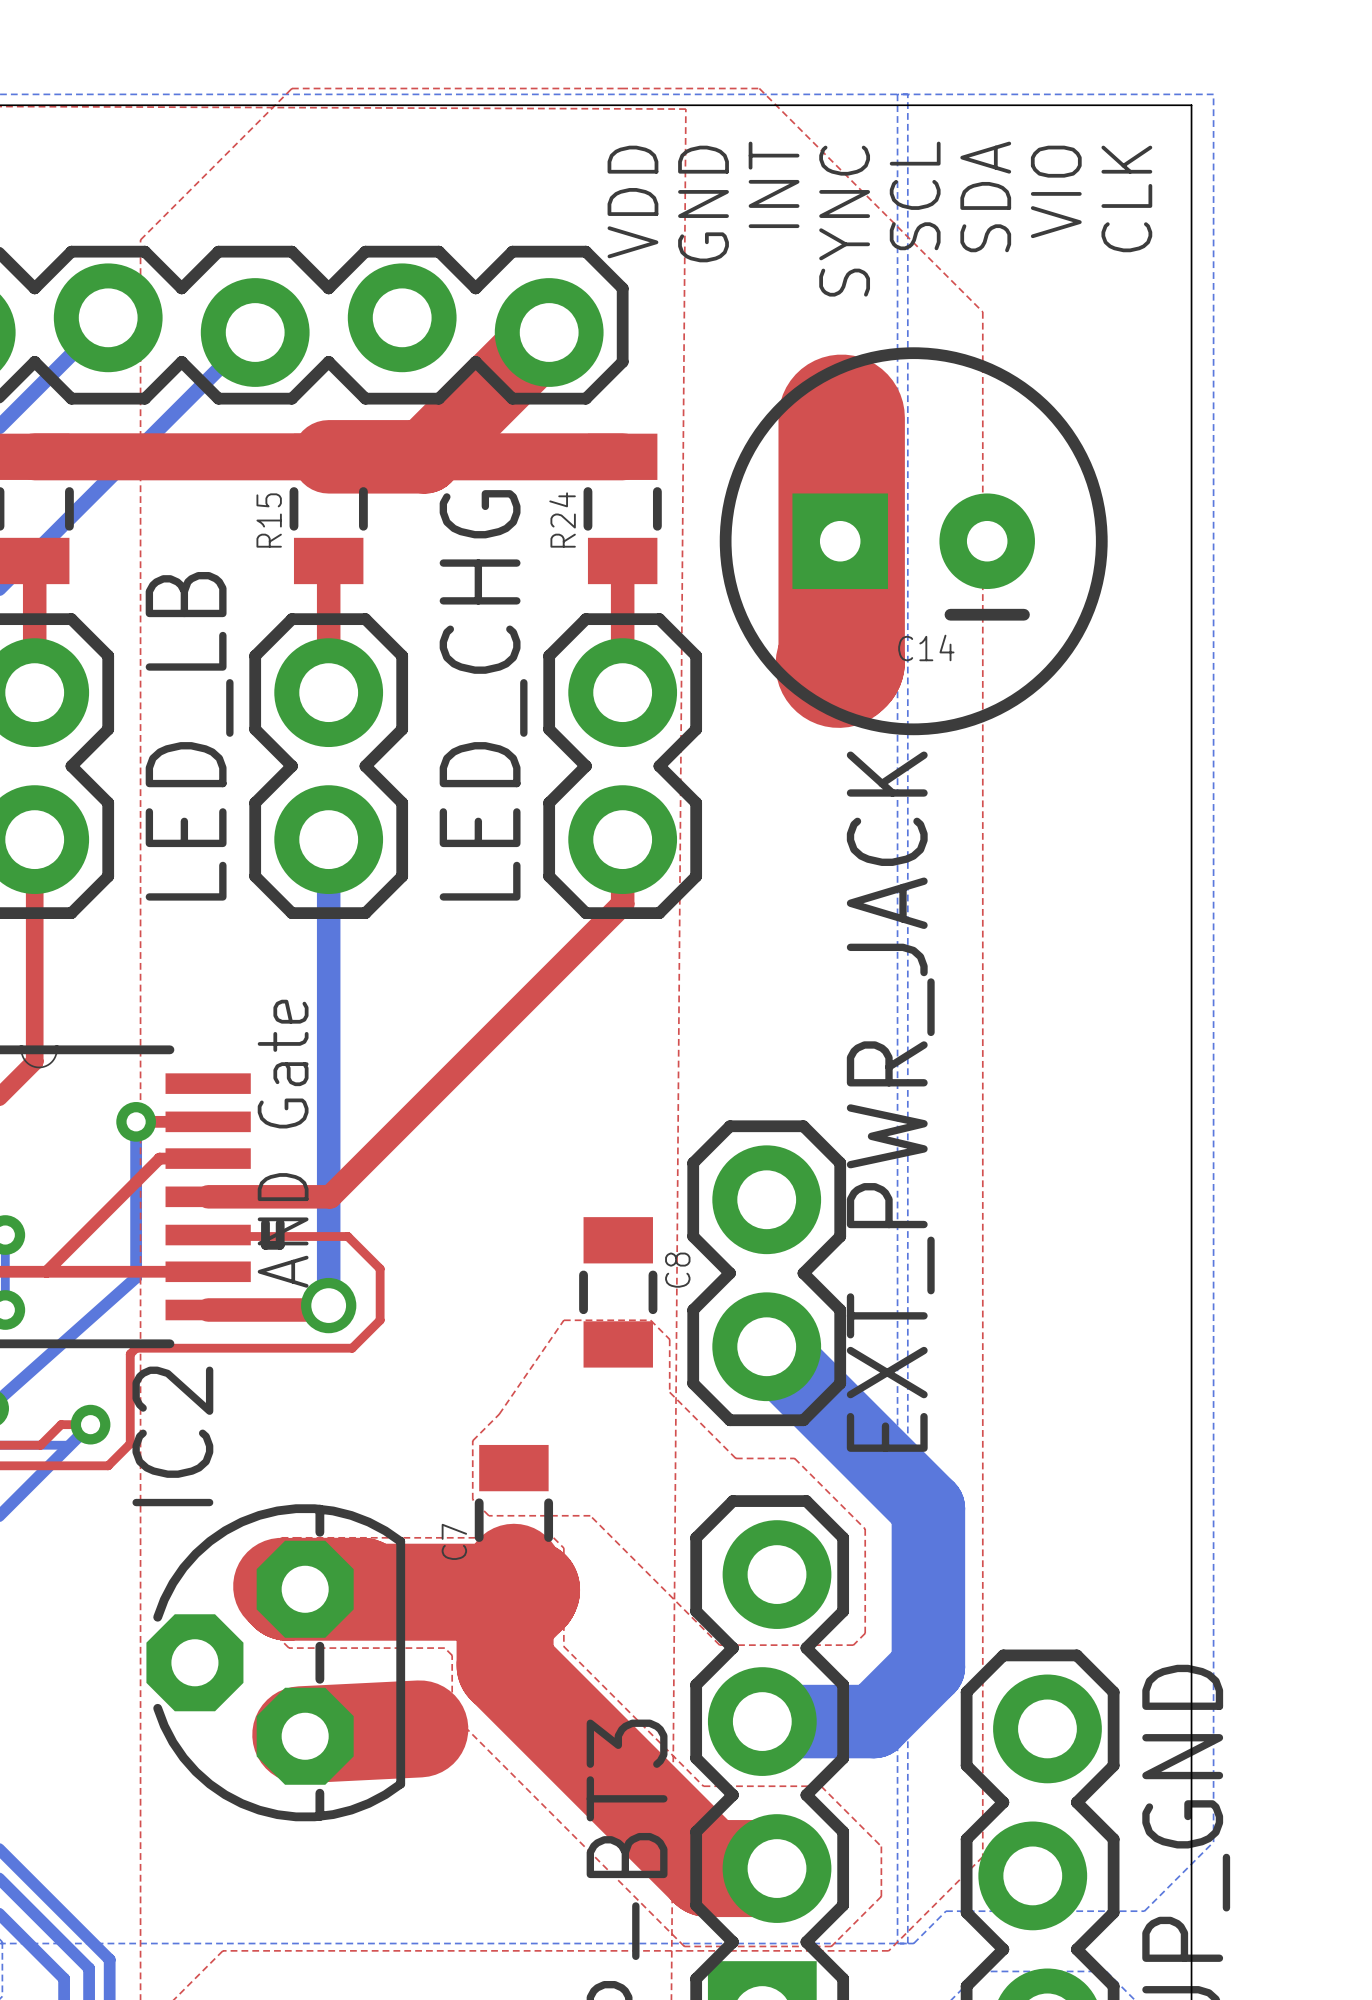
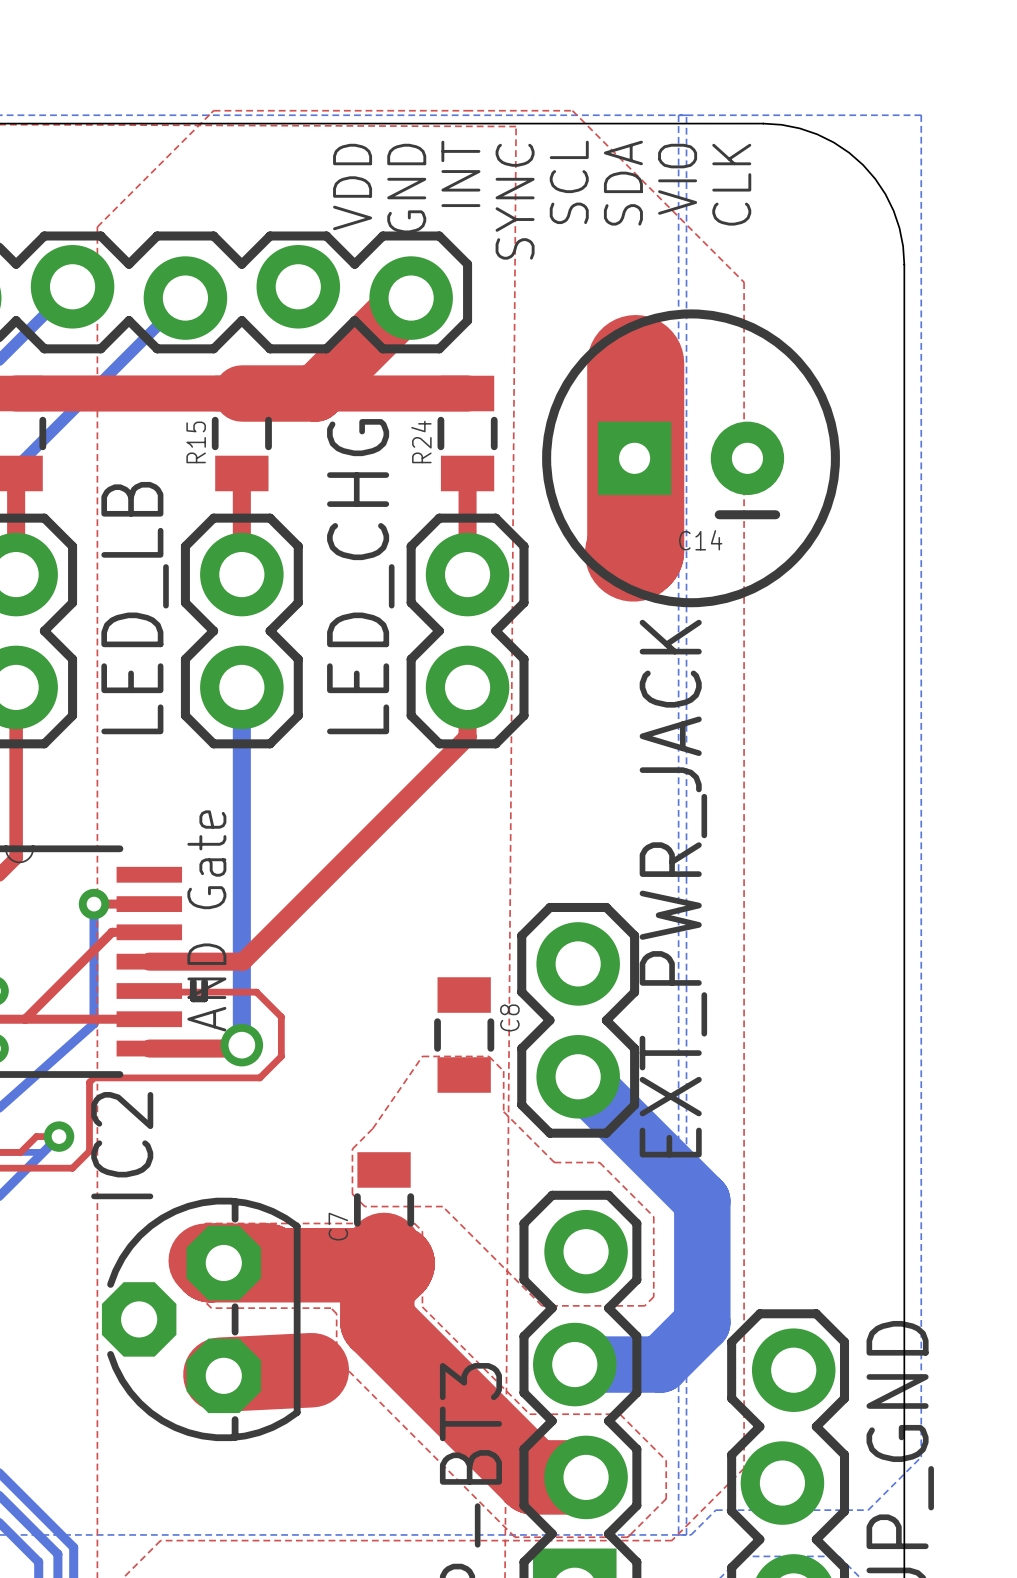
board edge: (1007, 105) (1191, 105) (1191, 288) -> (763, 123) (799, 128) (817, 134) (833, 142) (863, 164) (885, 194) (893, 210) (899, 228) (904, 264)
text position: INT (774, 184) -> INT (460, 173)
text position: VIO (1056, 191) -> VIO (677, 179)
text position: SCL (915, 195) -> SCL (569, 182)
text position: SDA (985, 196) -> SDA (623, 183)
text position: CLK (1126, 198) -> CLK (731, 184)
text position: VDD (632, 201) -> VDD (352, 187)
text position: GND (703, 204) -> GND (406, 188)
text position: SYNC (844, 221) -> SYNC (515, 201)

